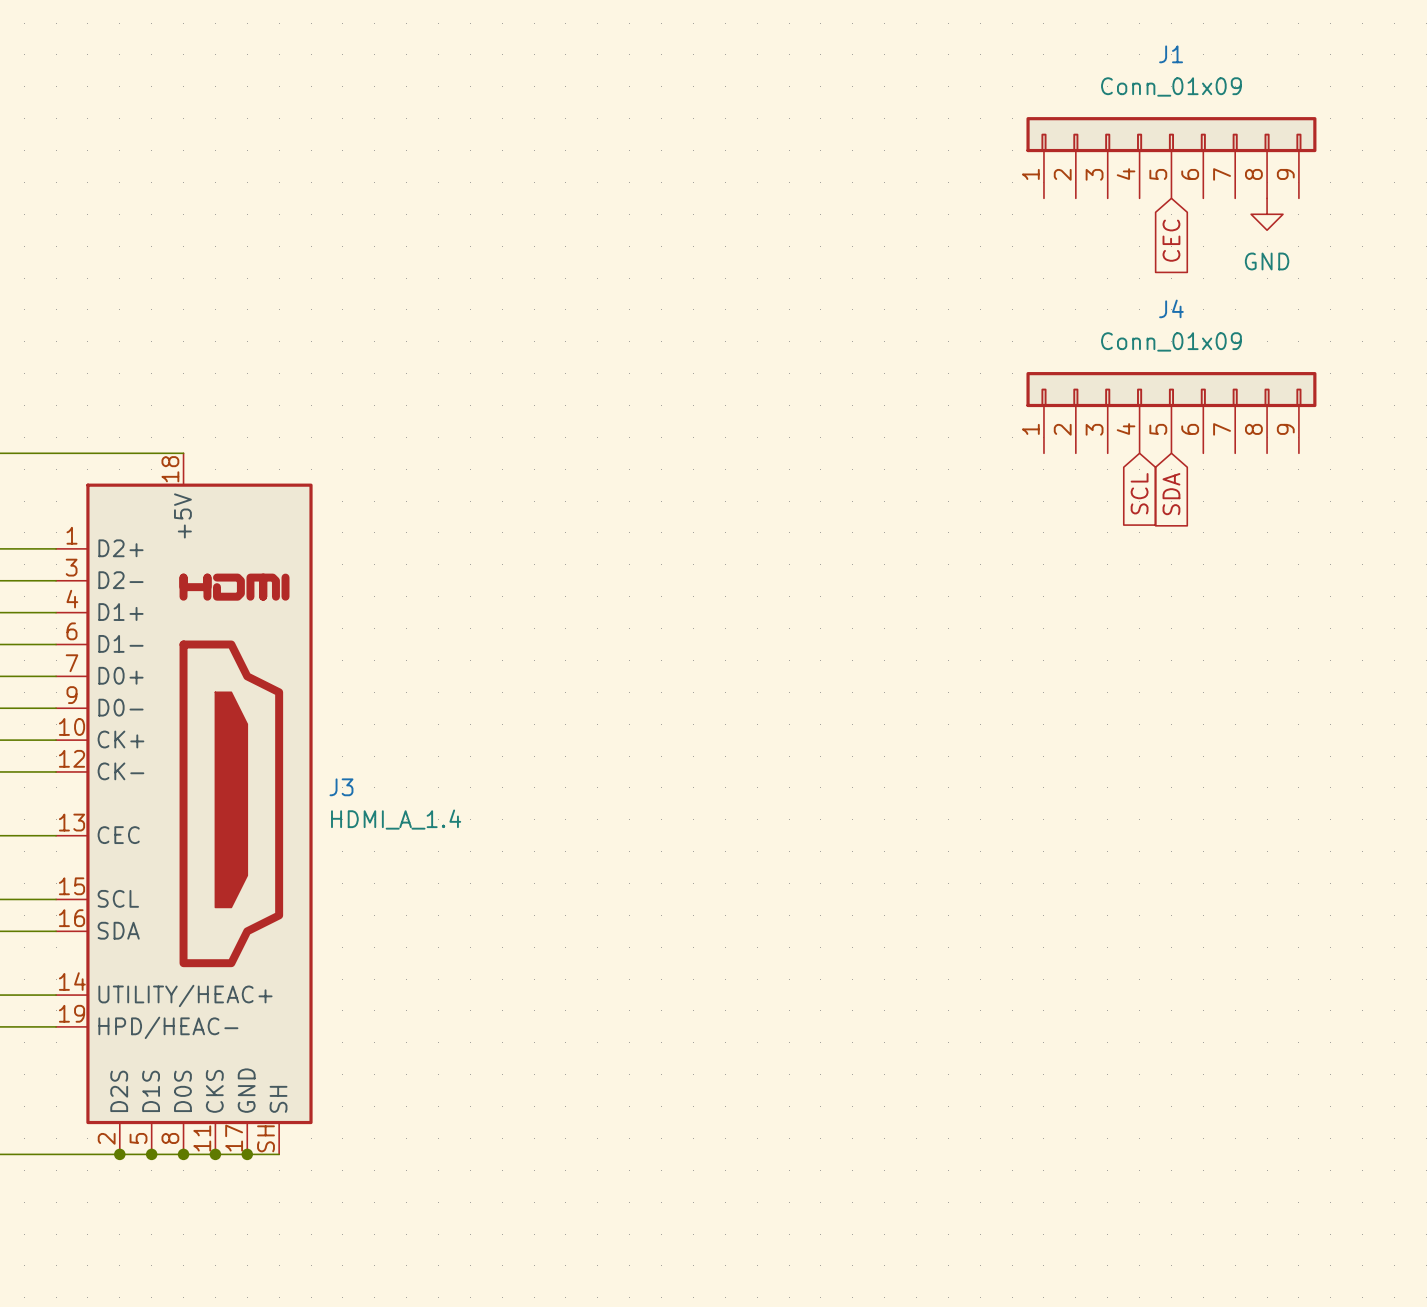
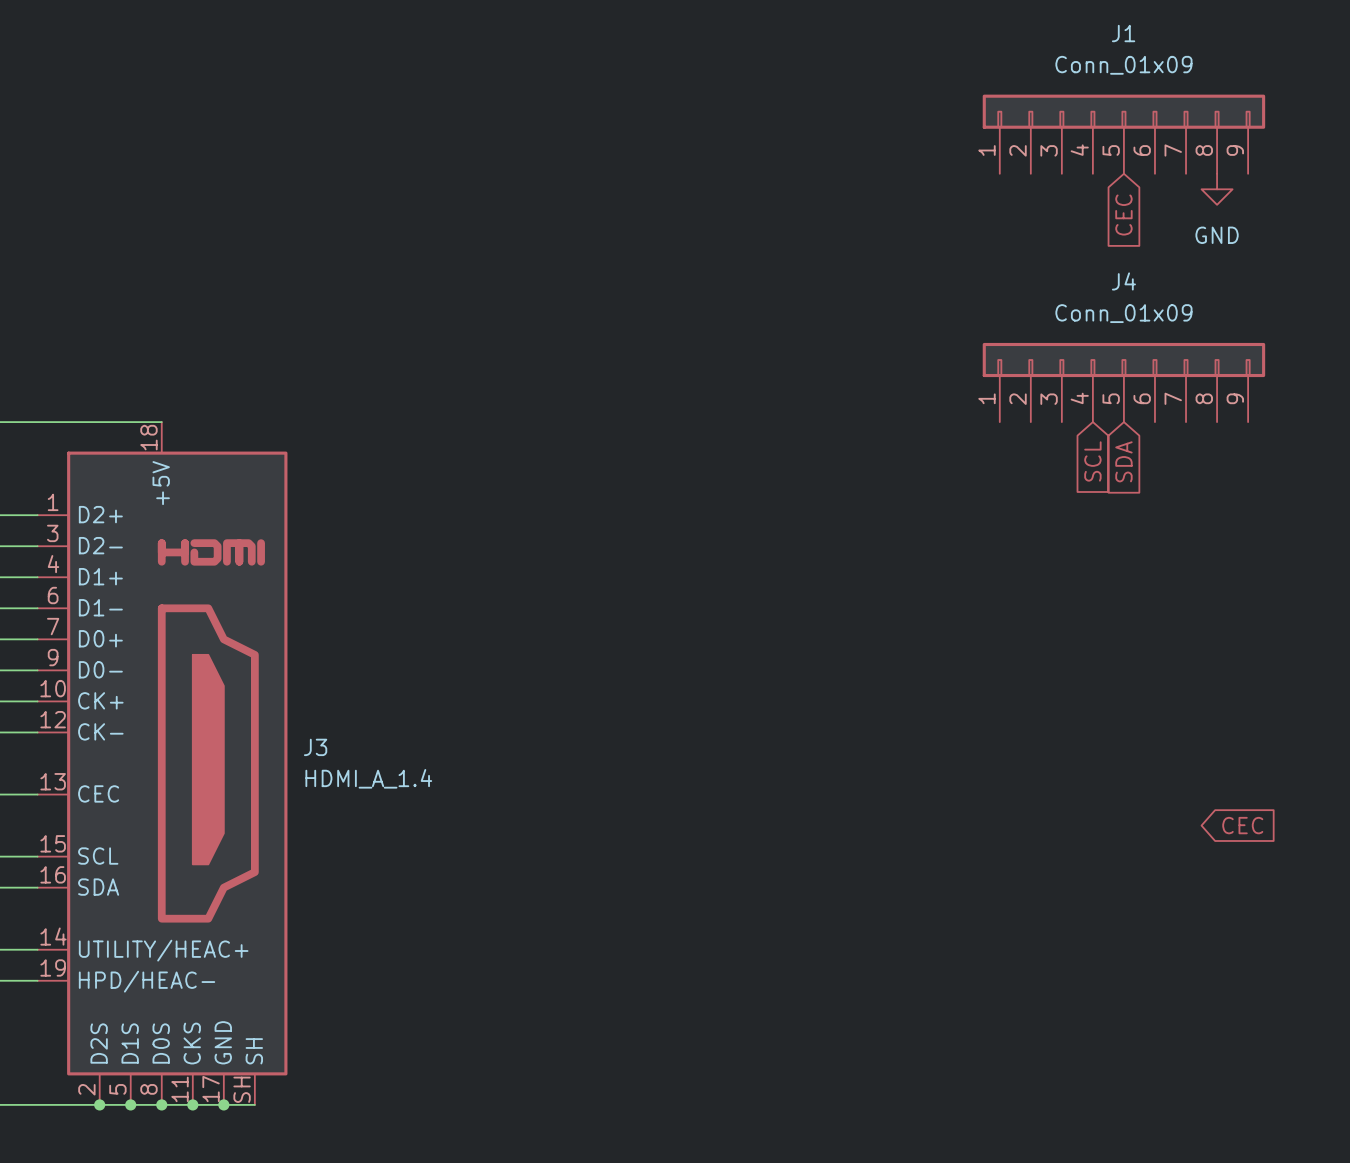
global label: none -> CEC (1242, 825)

